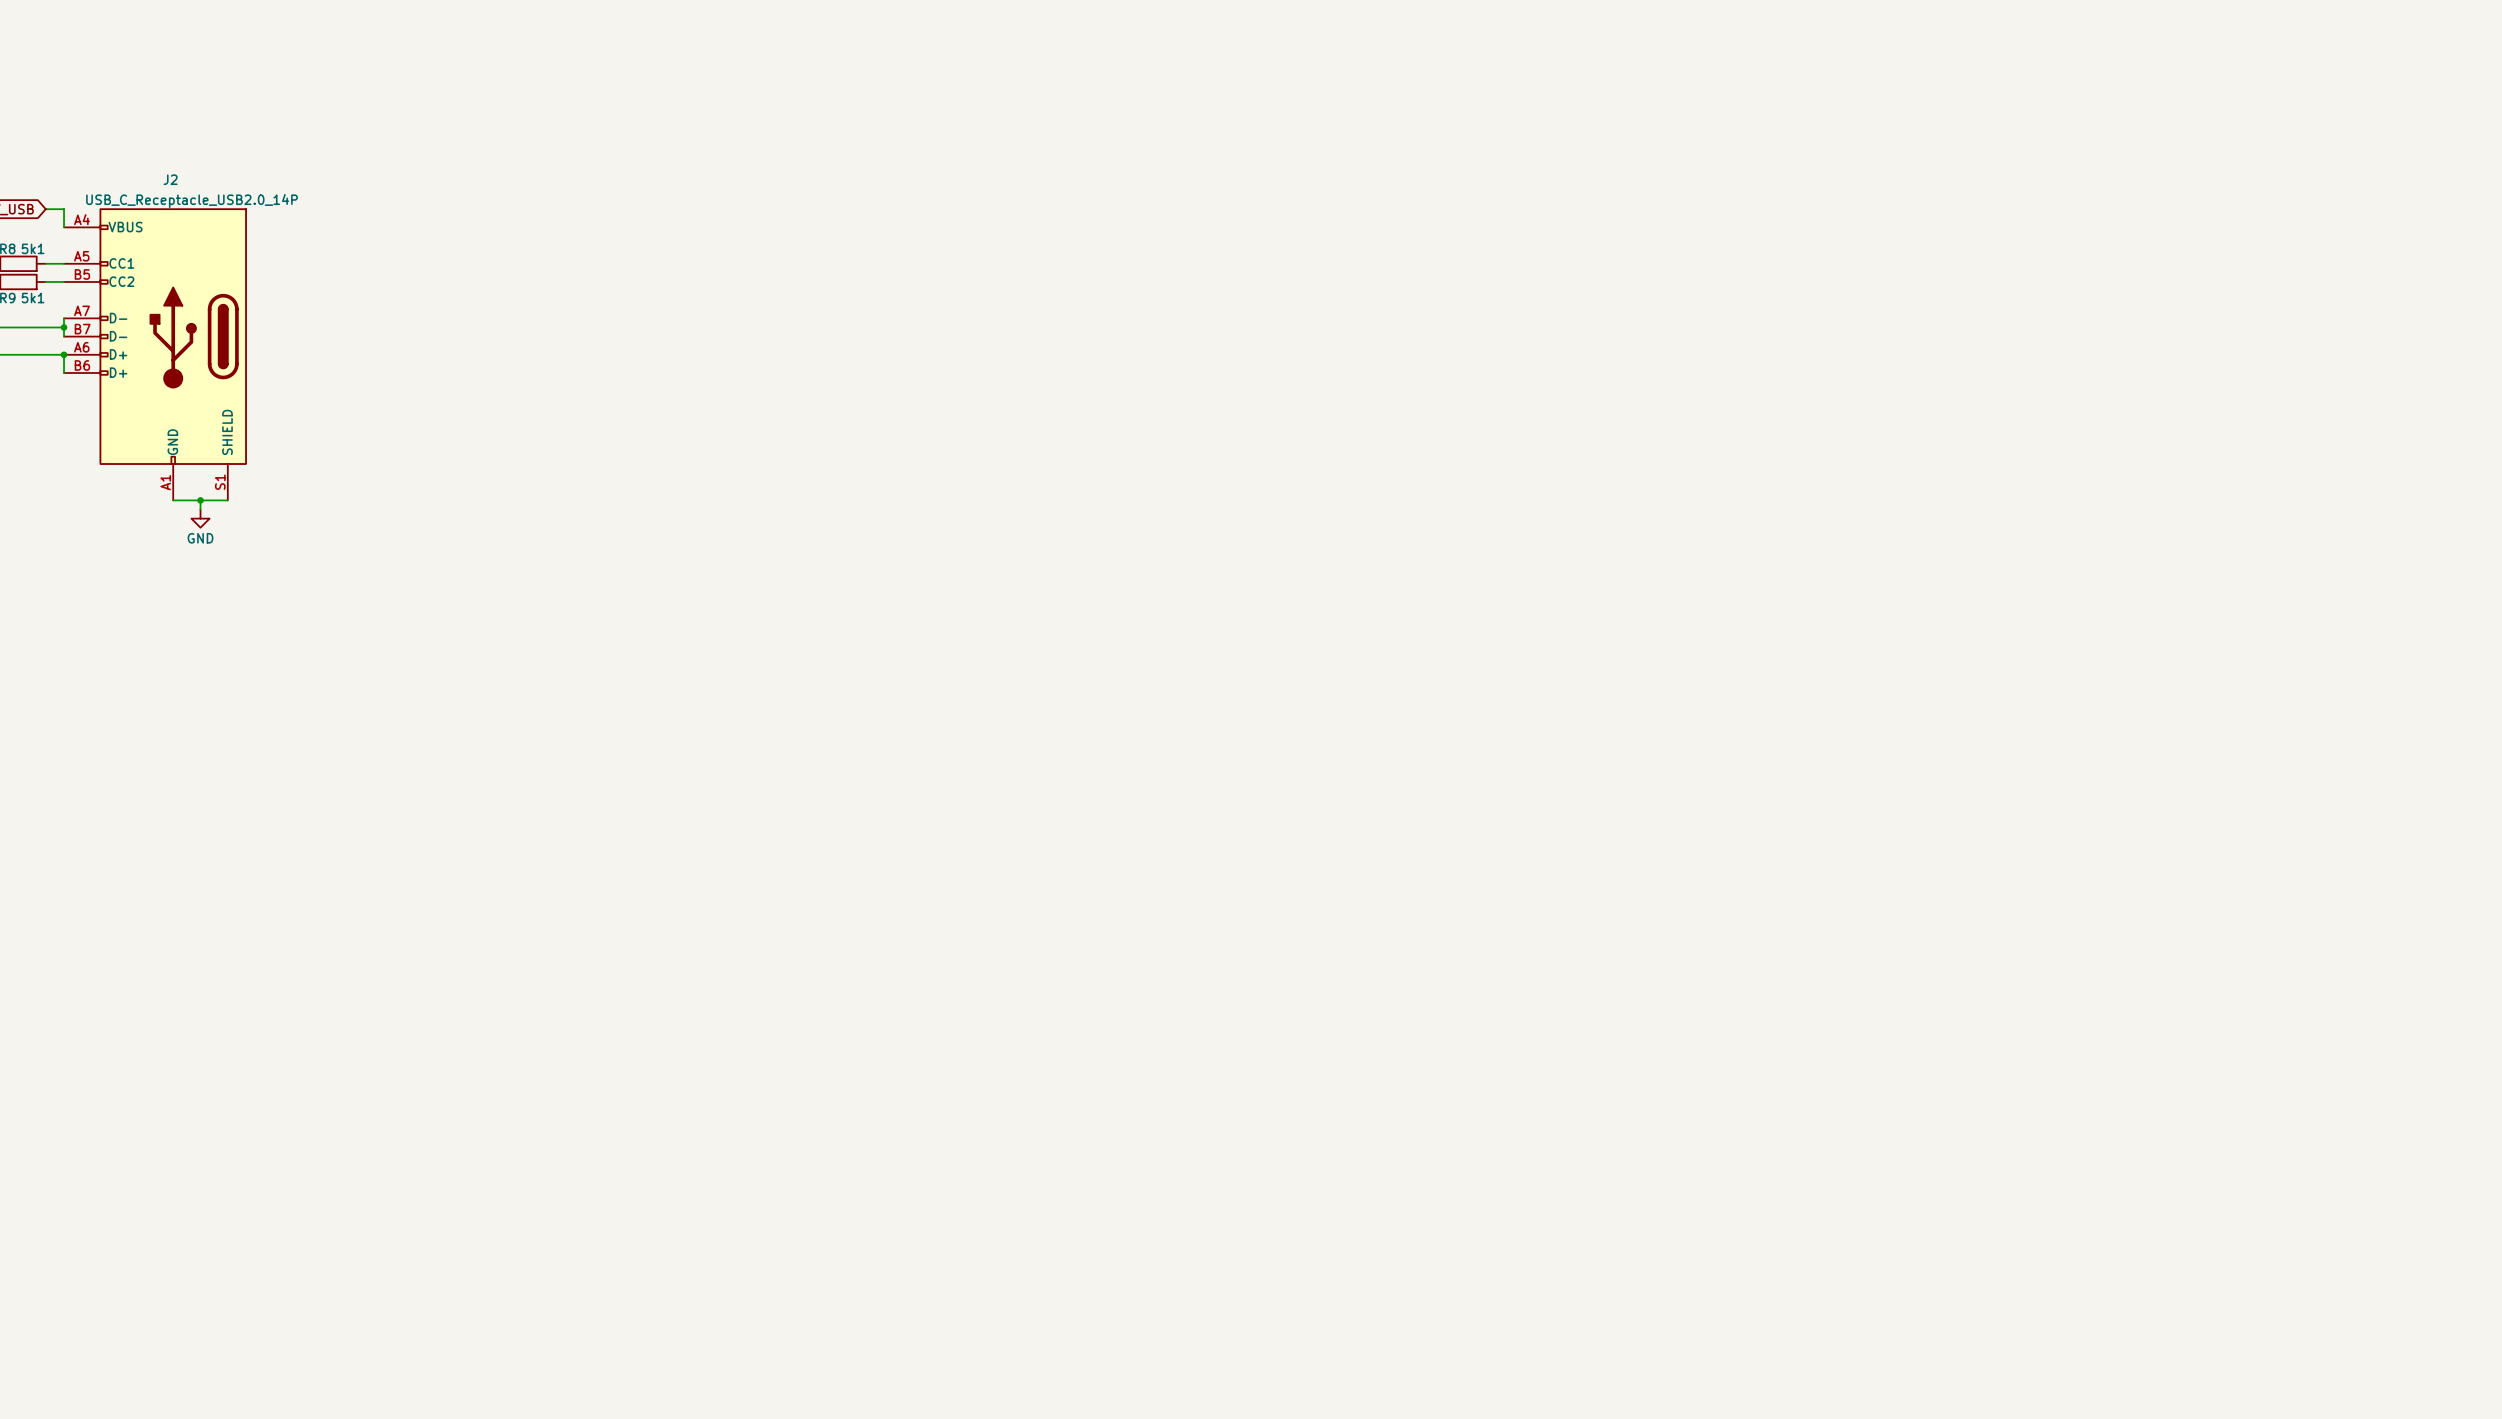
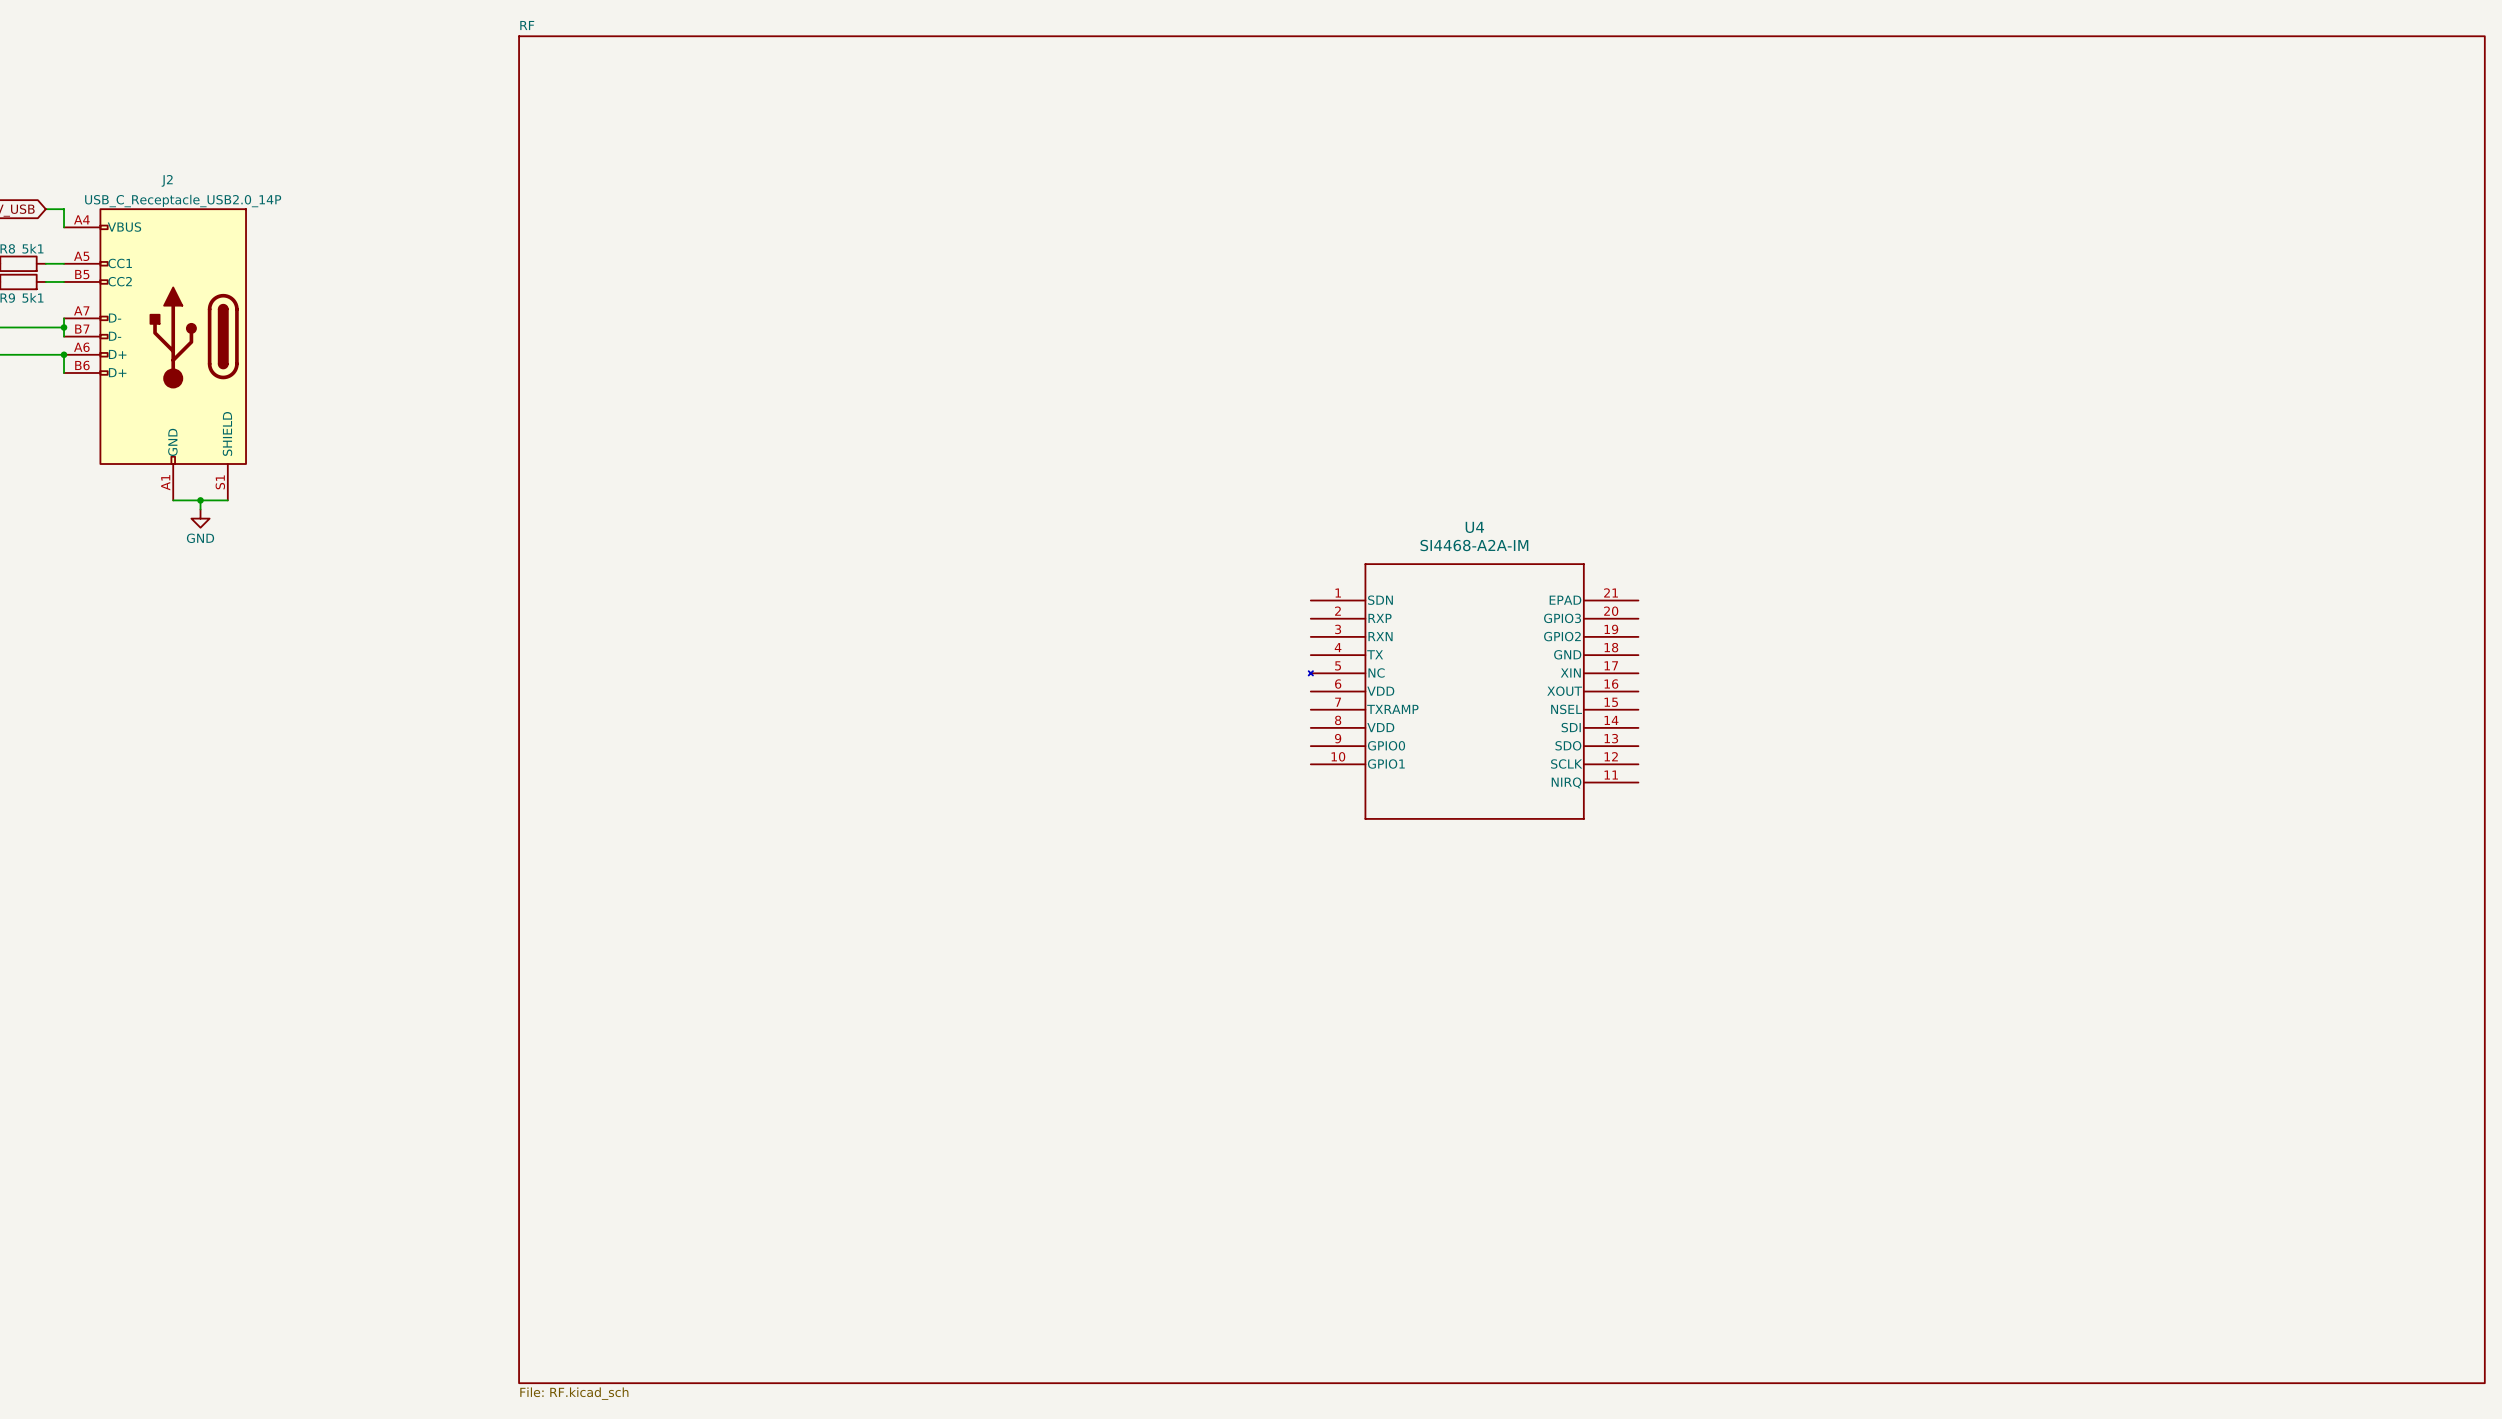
U4: none -> SI4468-A2A-IM (1473, 691)
sheet RF: none -> File: RF.kicad_sch (1501, 709)

